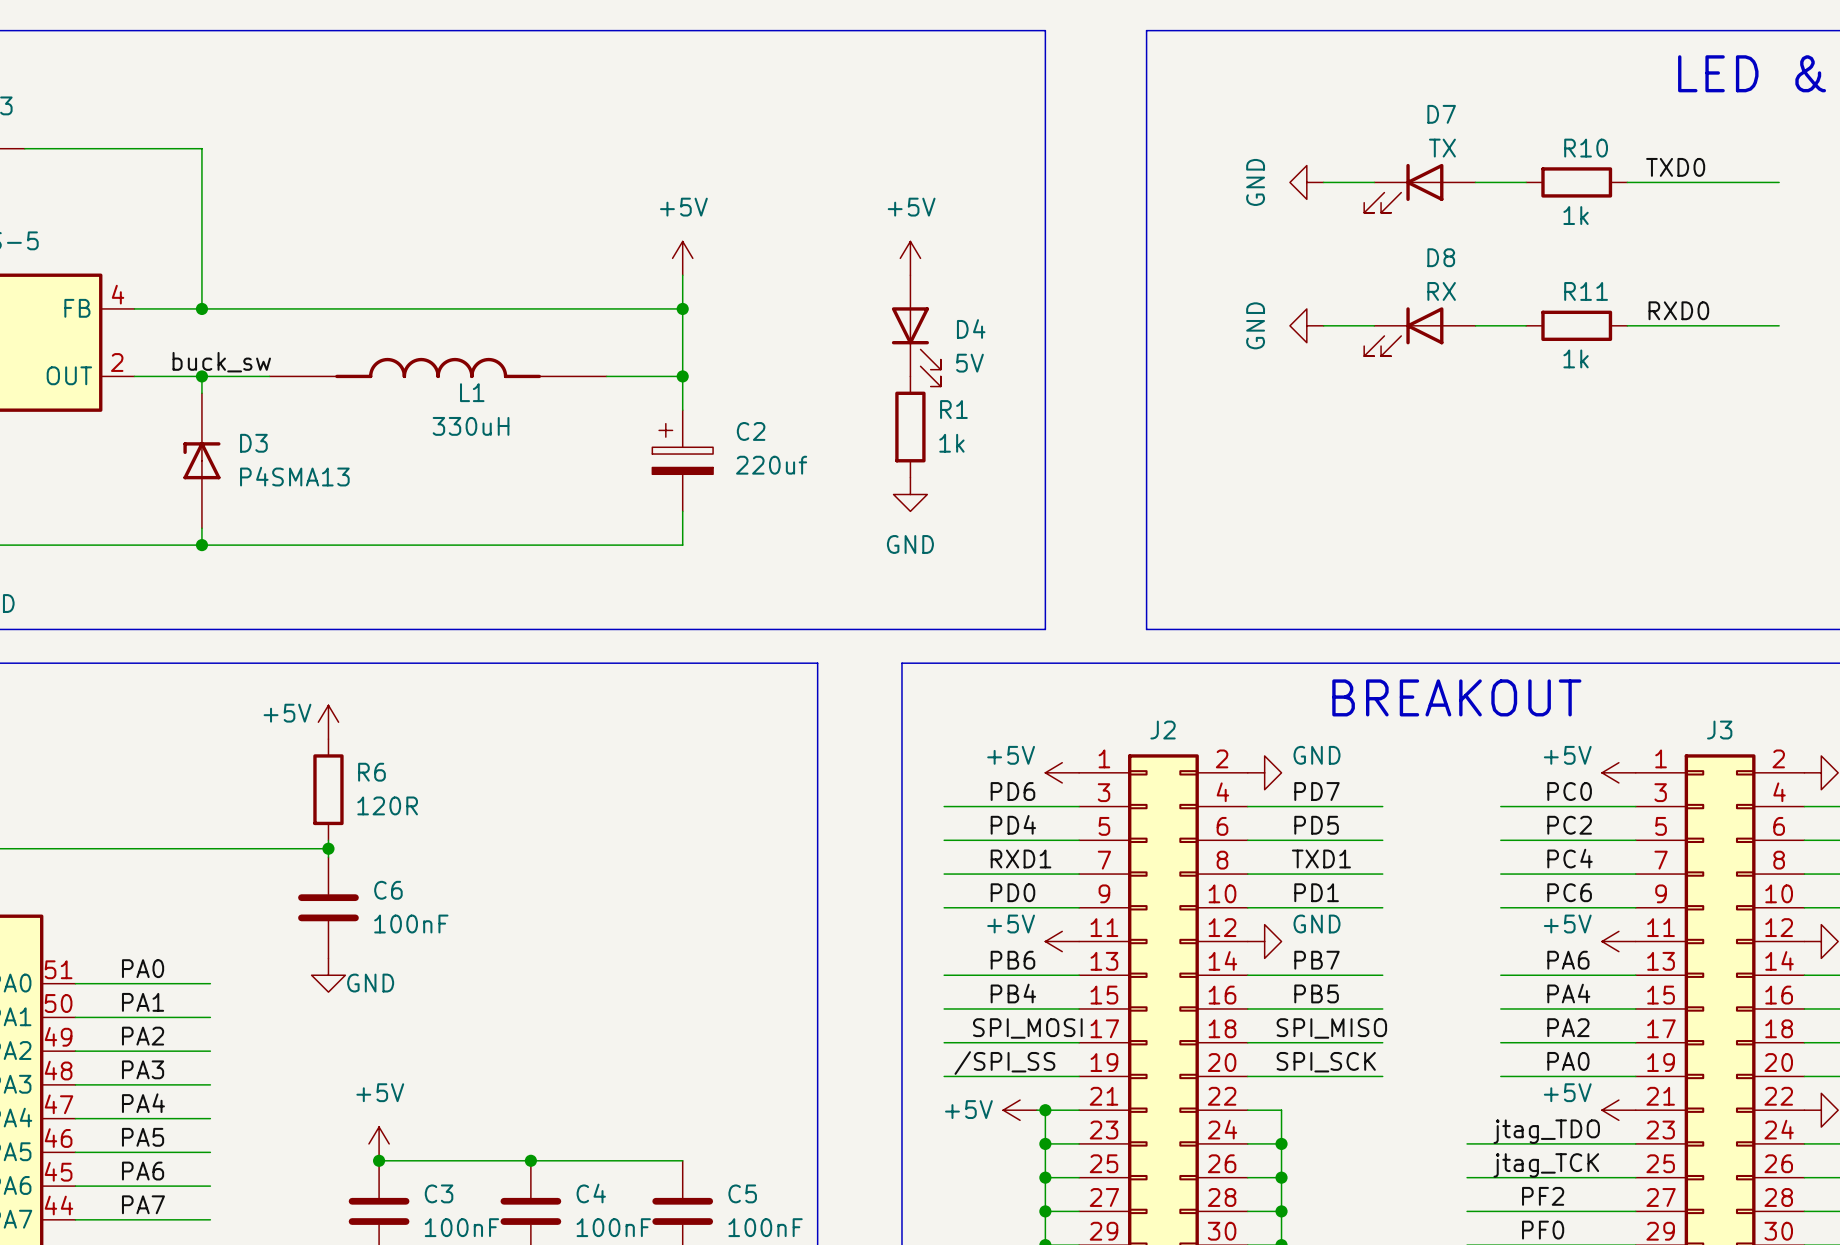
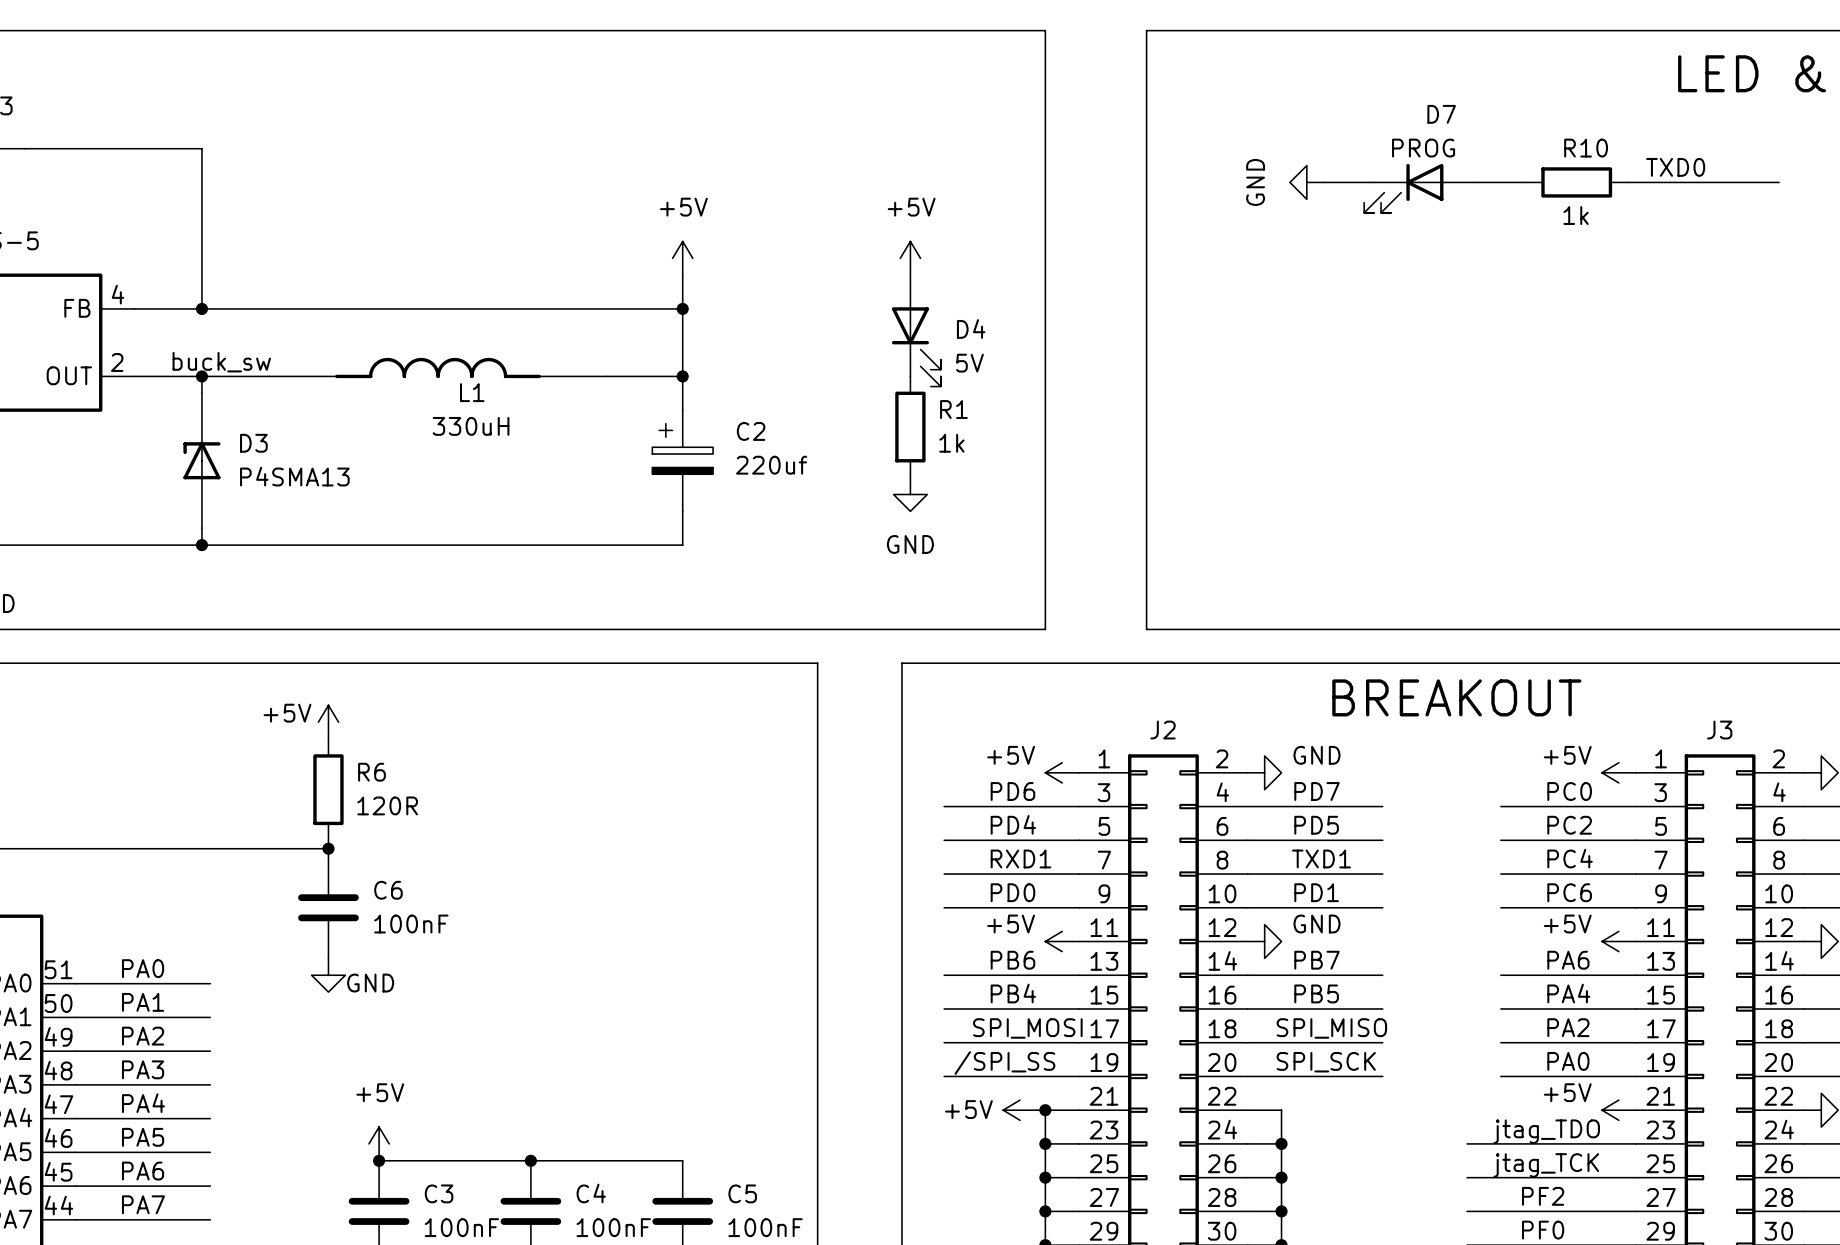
D7 value: TX (1442, 148) -> PROG (1423, 148)
label: RXD0 (1678, 310) -> none
power symbol: GND (1306, 325) -> none
wire: (1323, 325) (1374, 325) -> none
wire: (1475, 325) (1526, 325) -> none
R11: 1k (1576, 325) -> none
wire: (1627, 325) (1779, 325) -> none
D8: RX (1419, 331) -> none

